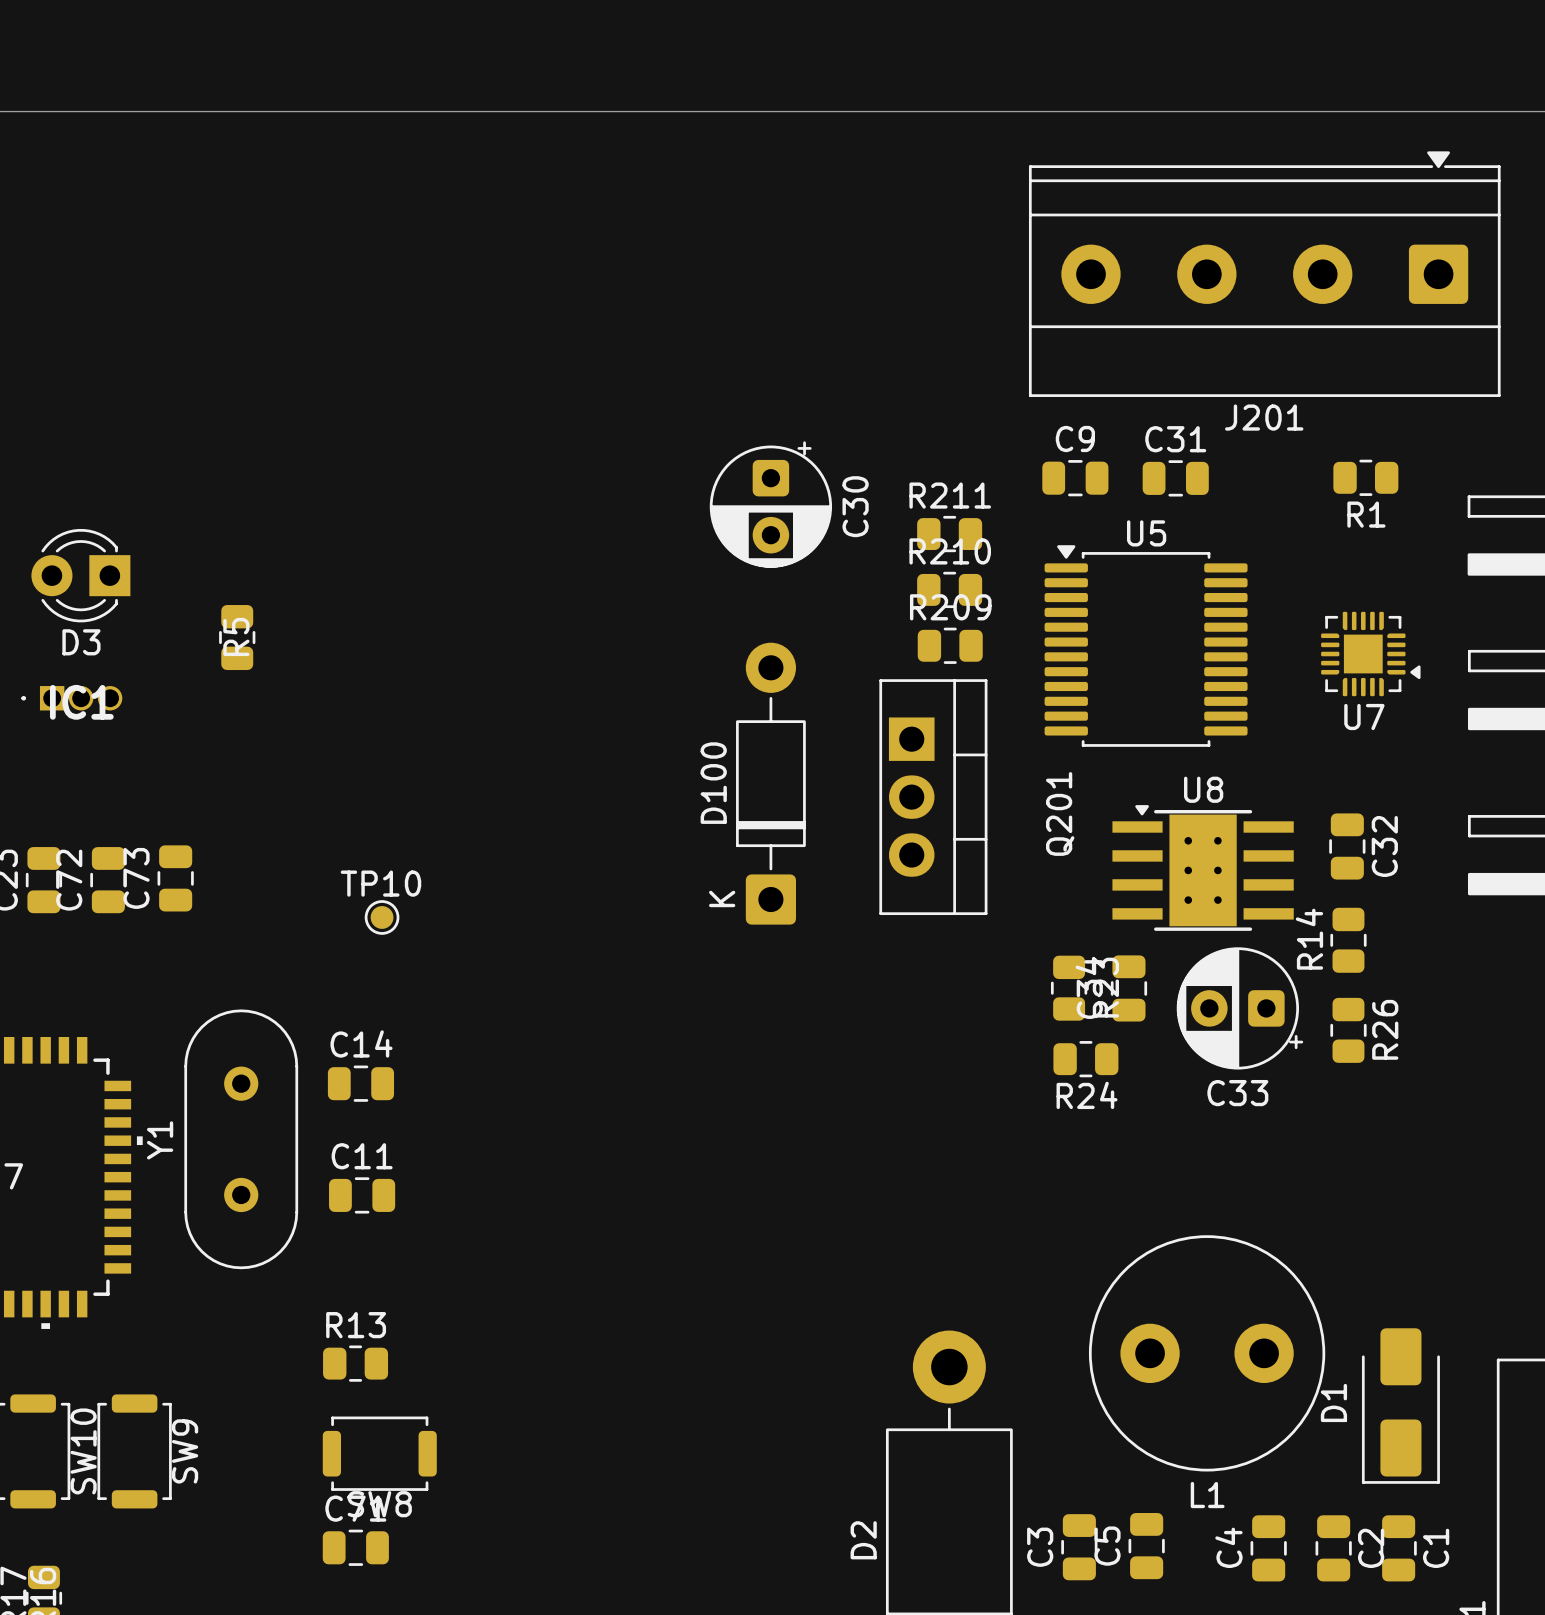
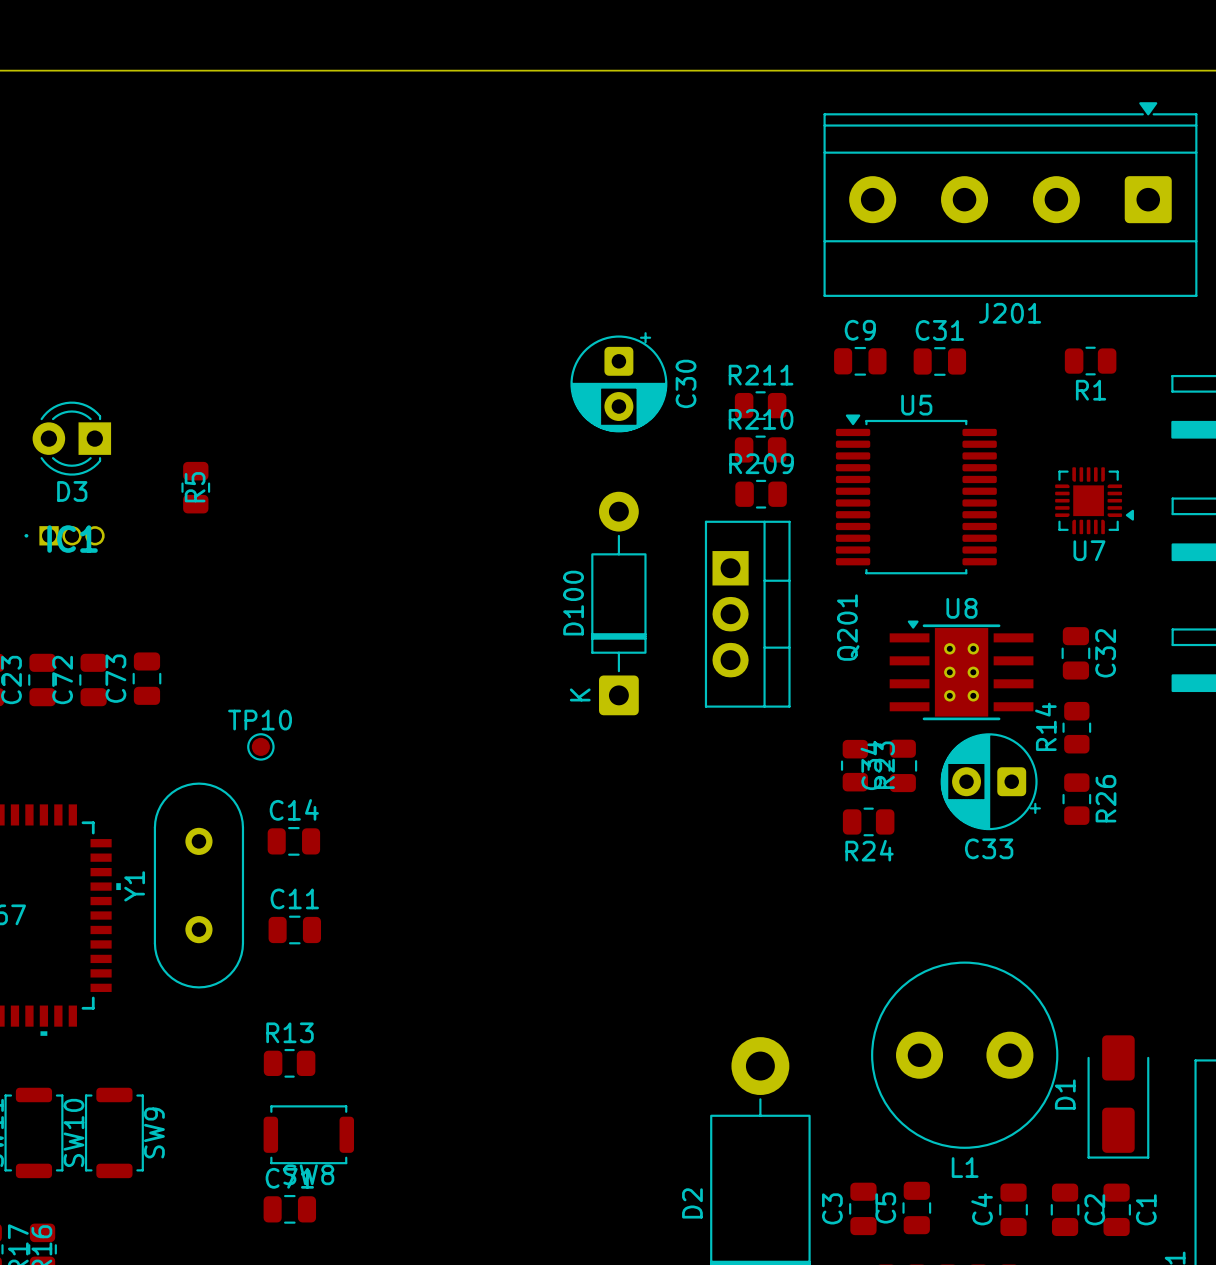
TP10 position: (382, 917) -> (260, 746)

